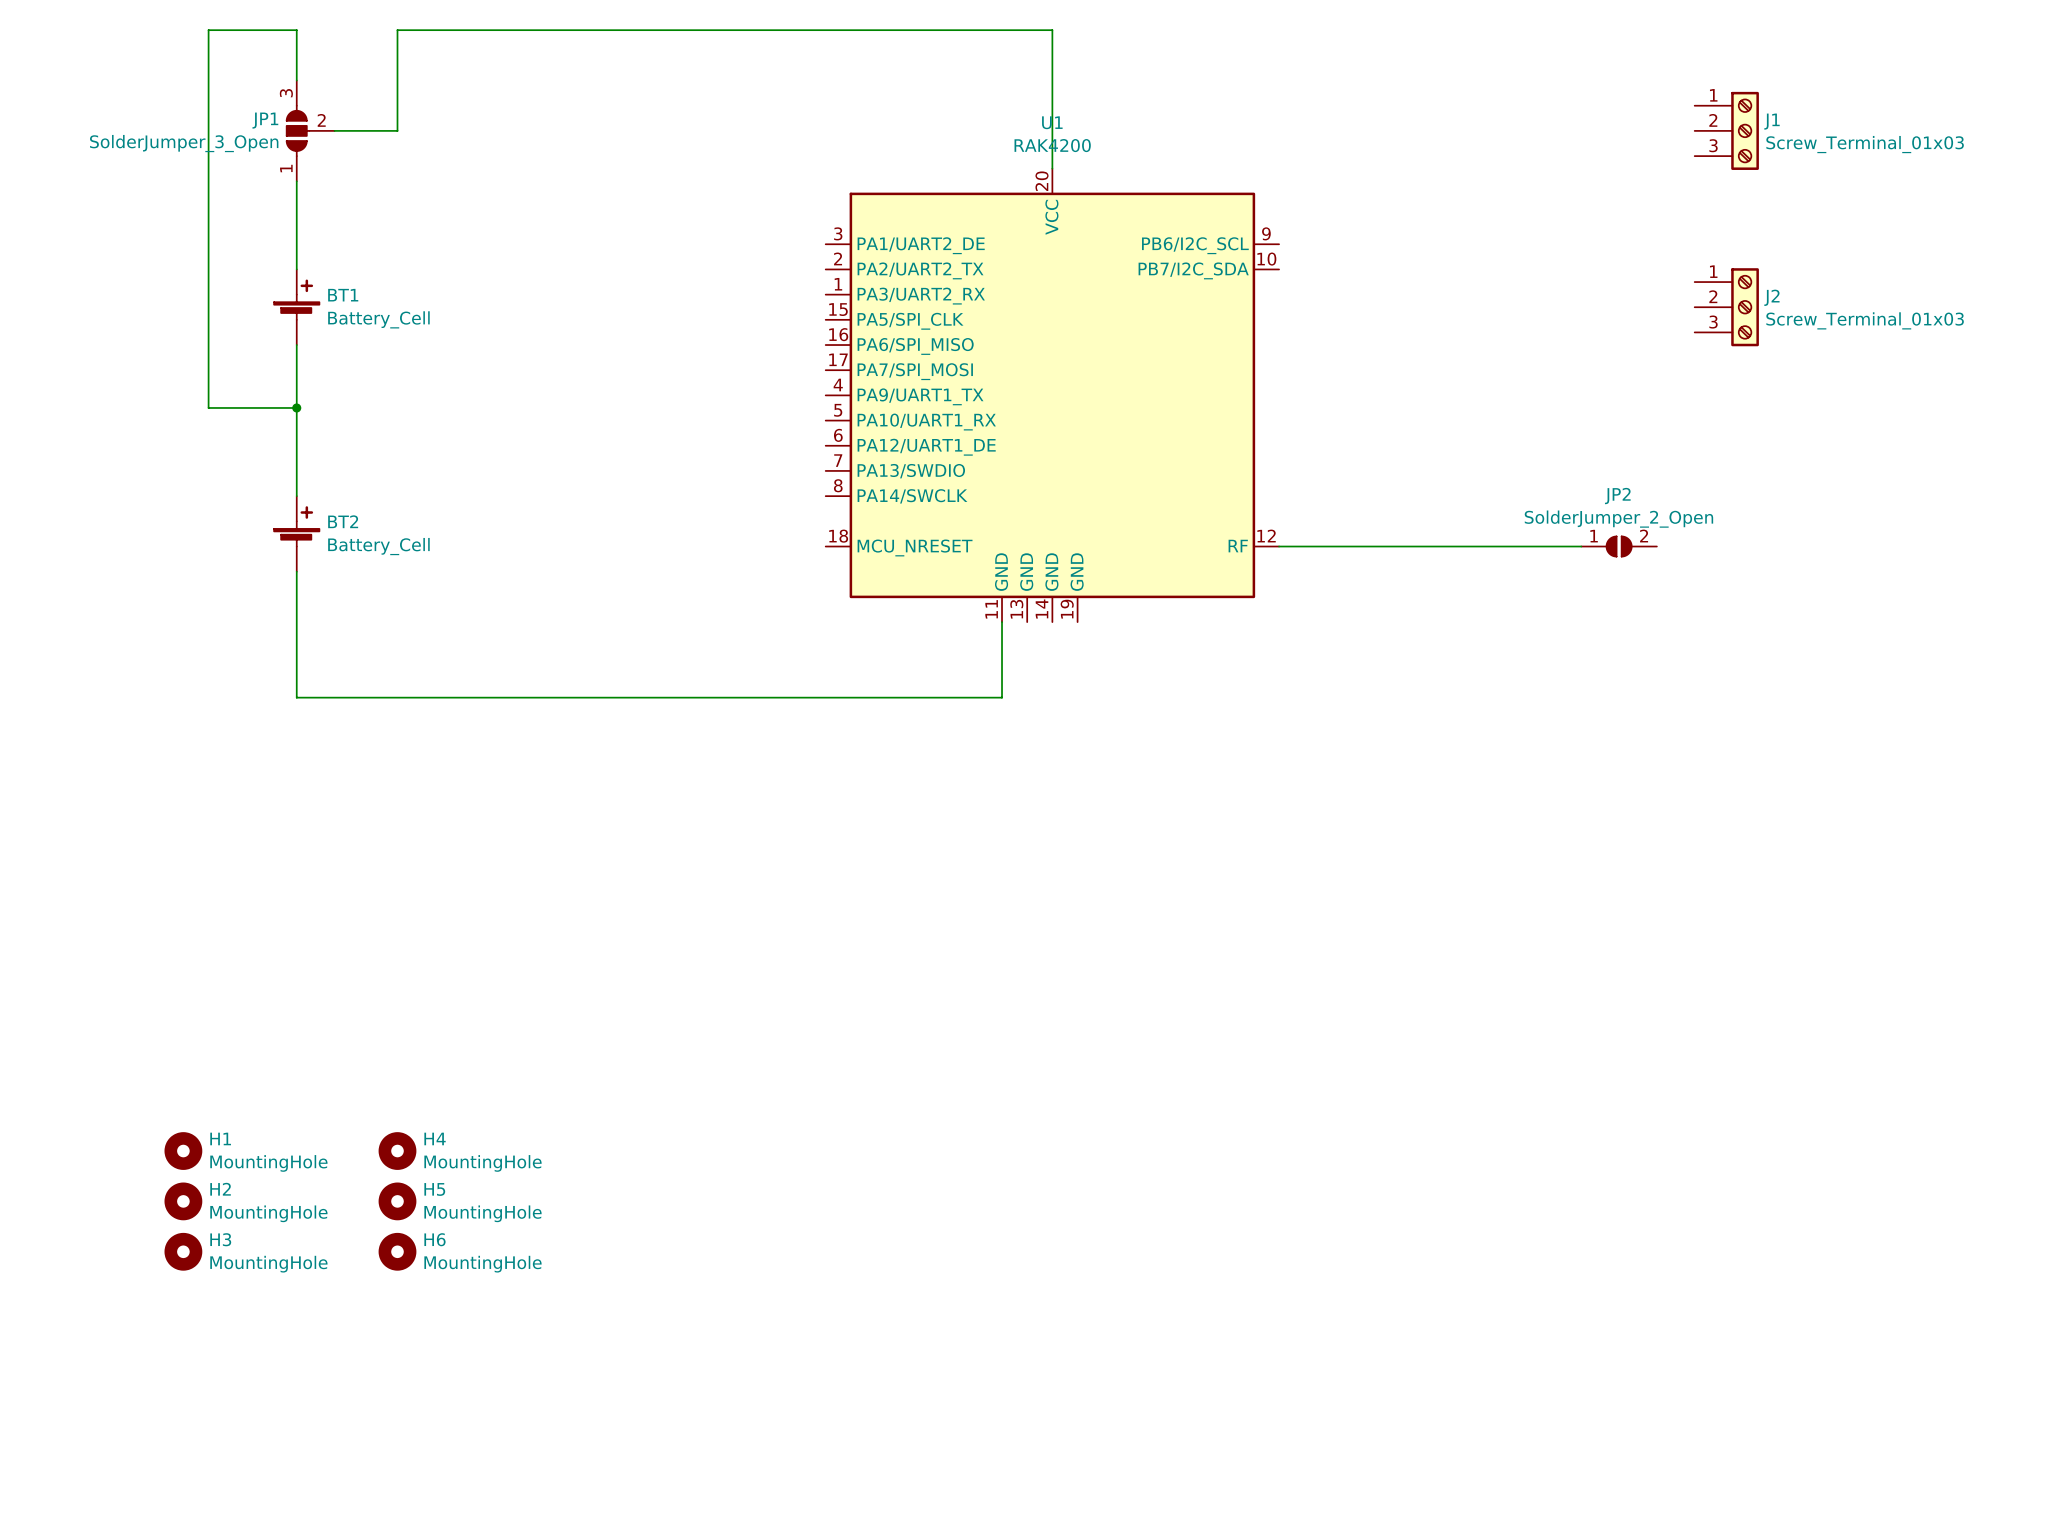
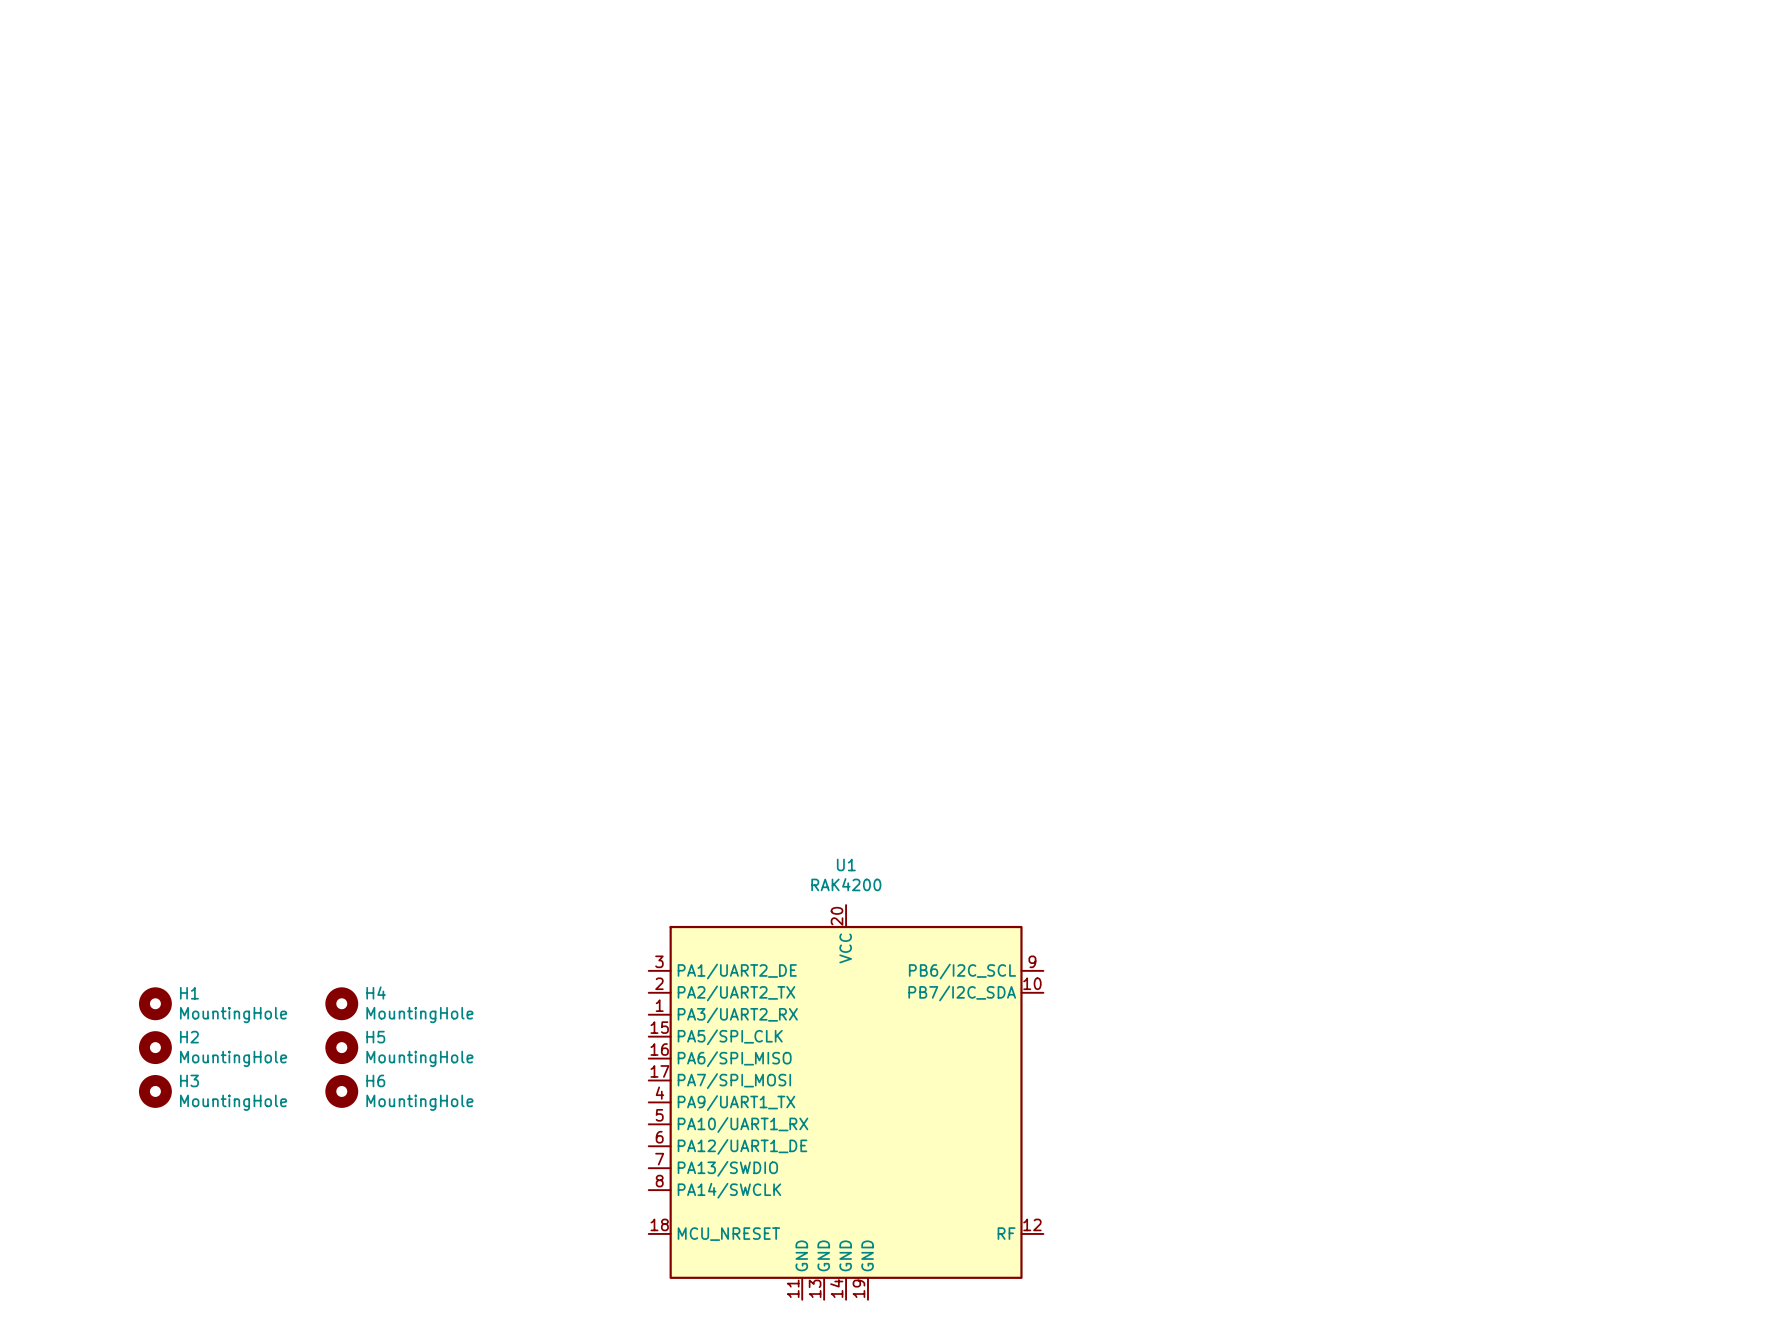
wire: (296, 80) (296, 30) (208, 30) (208, 407) (296, 407) -> none
JP1: SolderJumper_3_Open (310, 130) -> none
wire: (334, 130) (397, 130) (397, 30) (1052, 30) (1052, 168) -> none
J1: Screw_Terminal_01x03 (1726, 130) -> none
wire: (296, 181) (296, 269) -> none
BT1: Battery_Cell (296, 307) -> none
J2: Screw_Terminal_01x03 (1726, 307) -> none
wire: (296, 345) (296, 496) -> none
U1 position: (1052, 395) -> (846, 1102)
junction: (296, 407) -> none
BT2: Battery_Cell (296, 533) -> none
wire: (1279, 546) (1581, 546) -> none
JP2: SolderJumper_2_Open (1619, 546) -> none
wire: (296, 571) (296, 697) (1002, 697) (1002, 622) -> none

